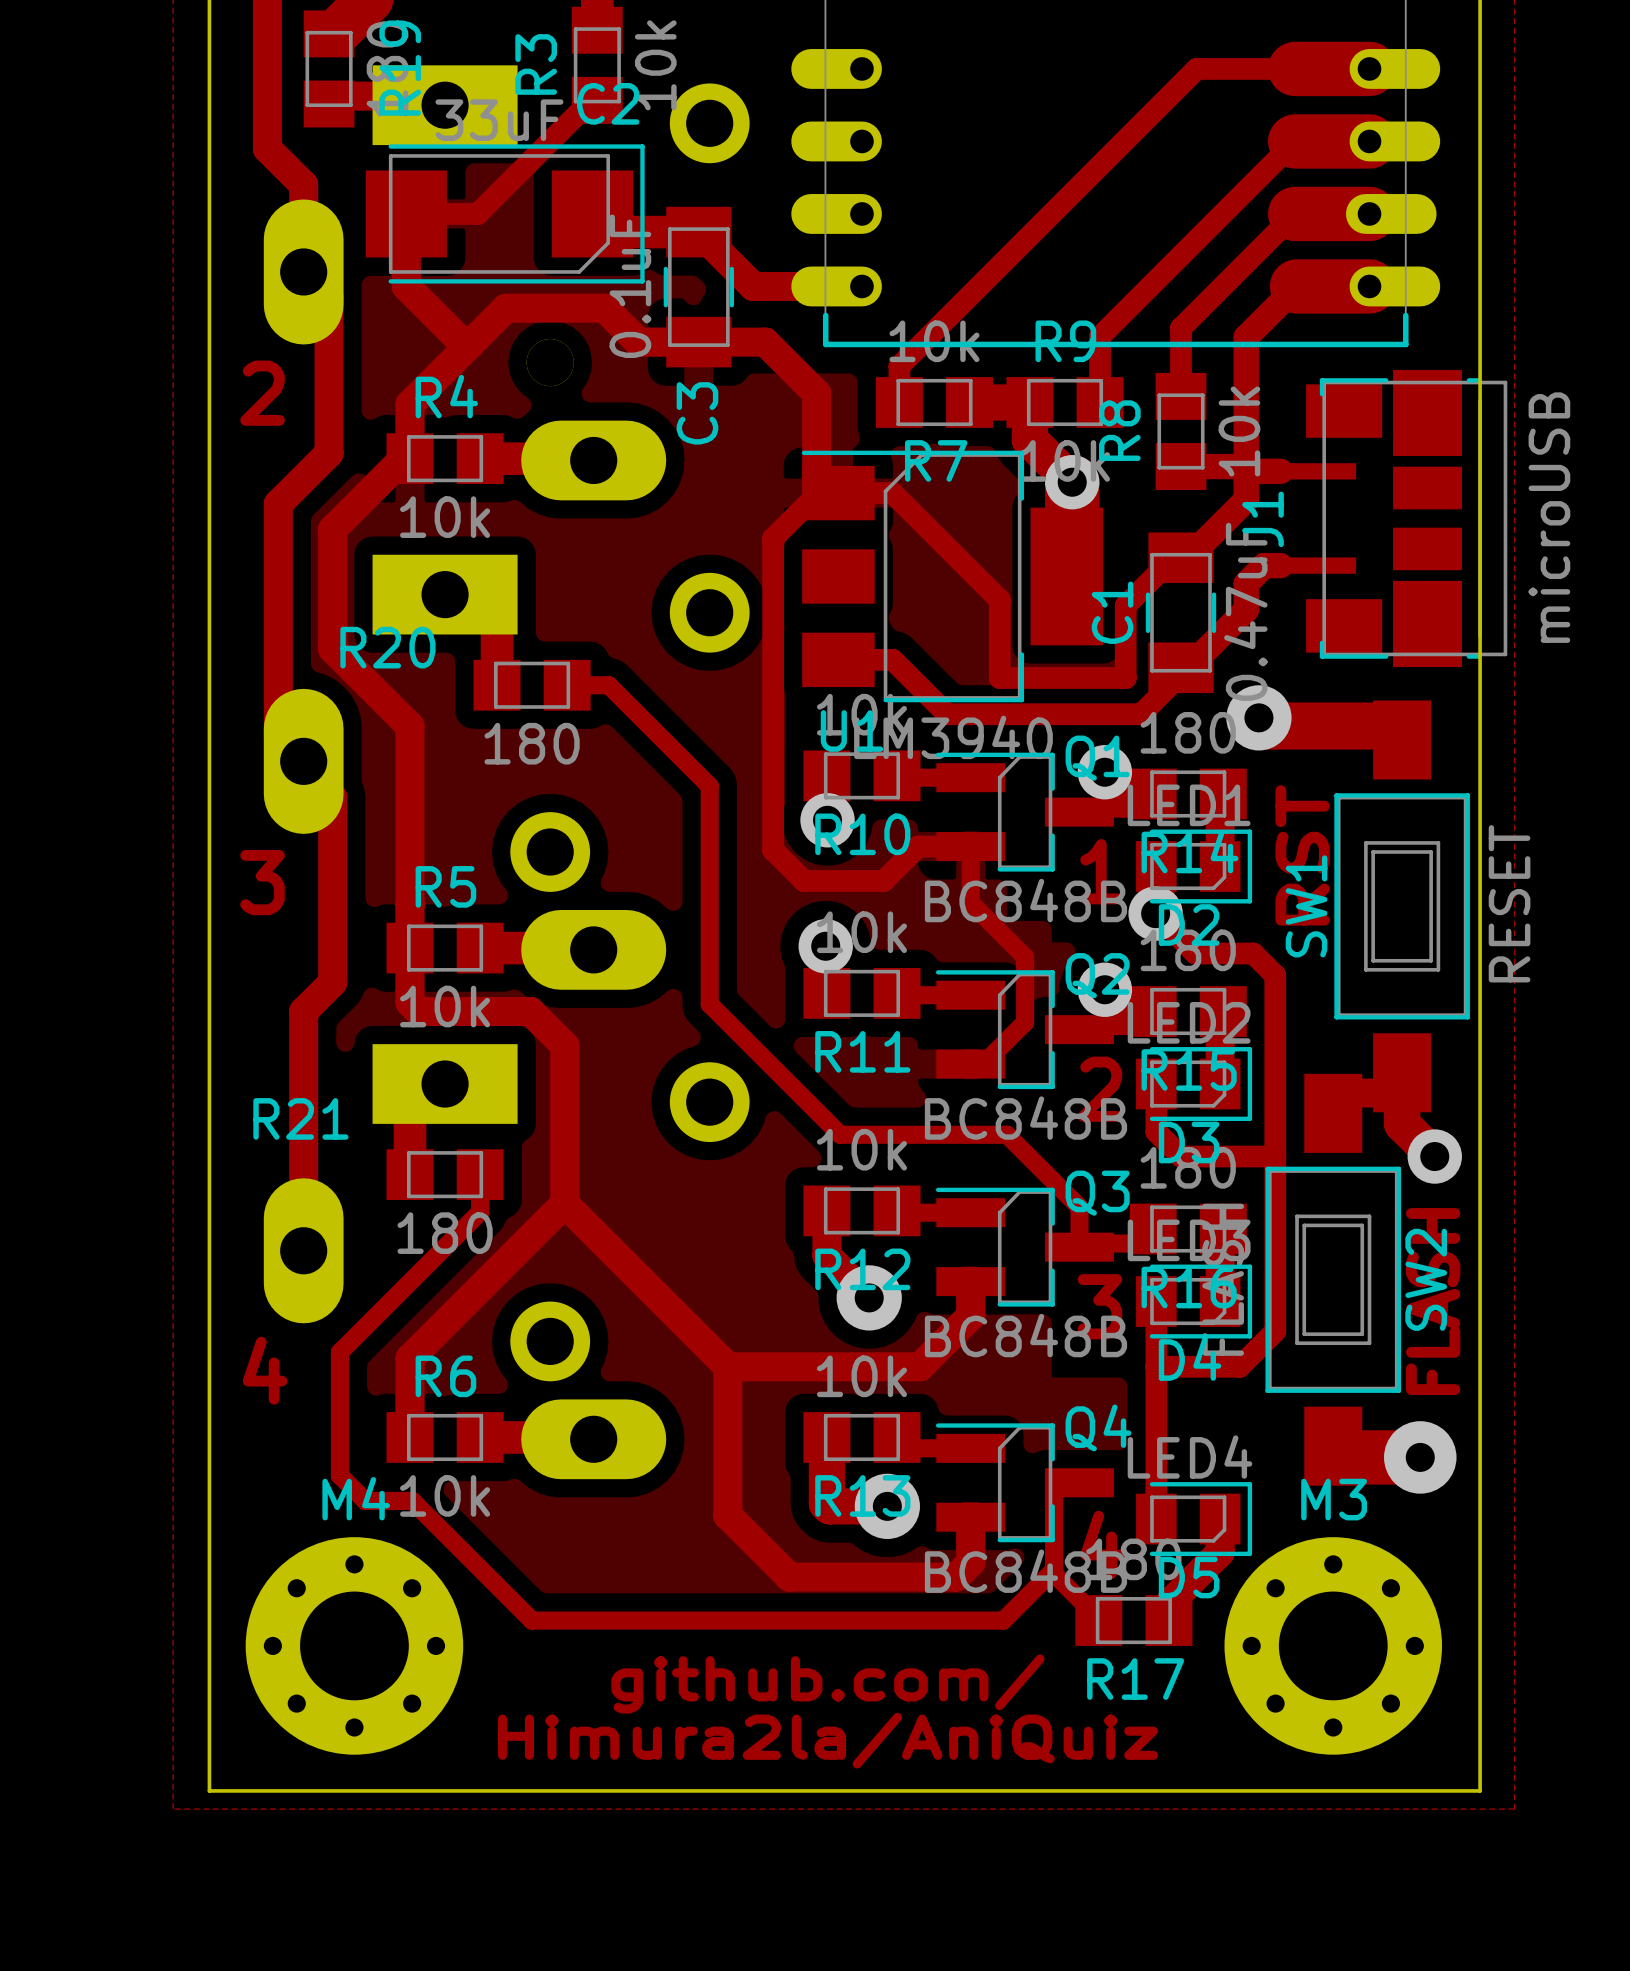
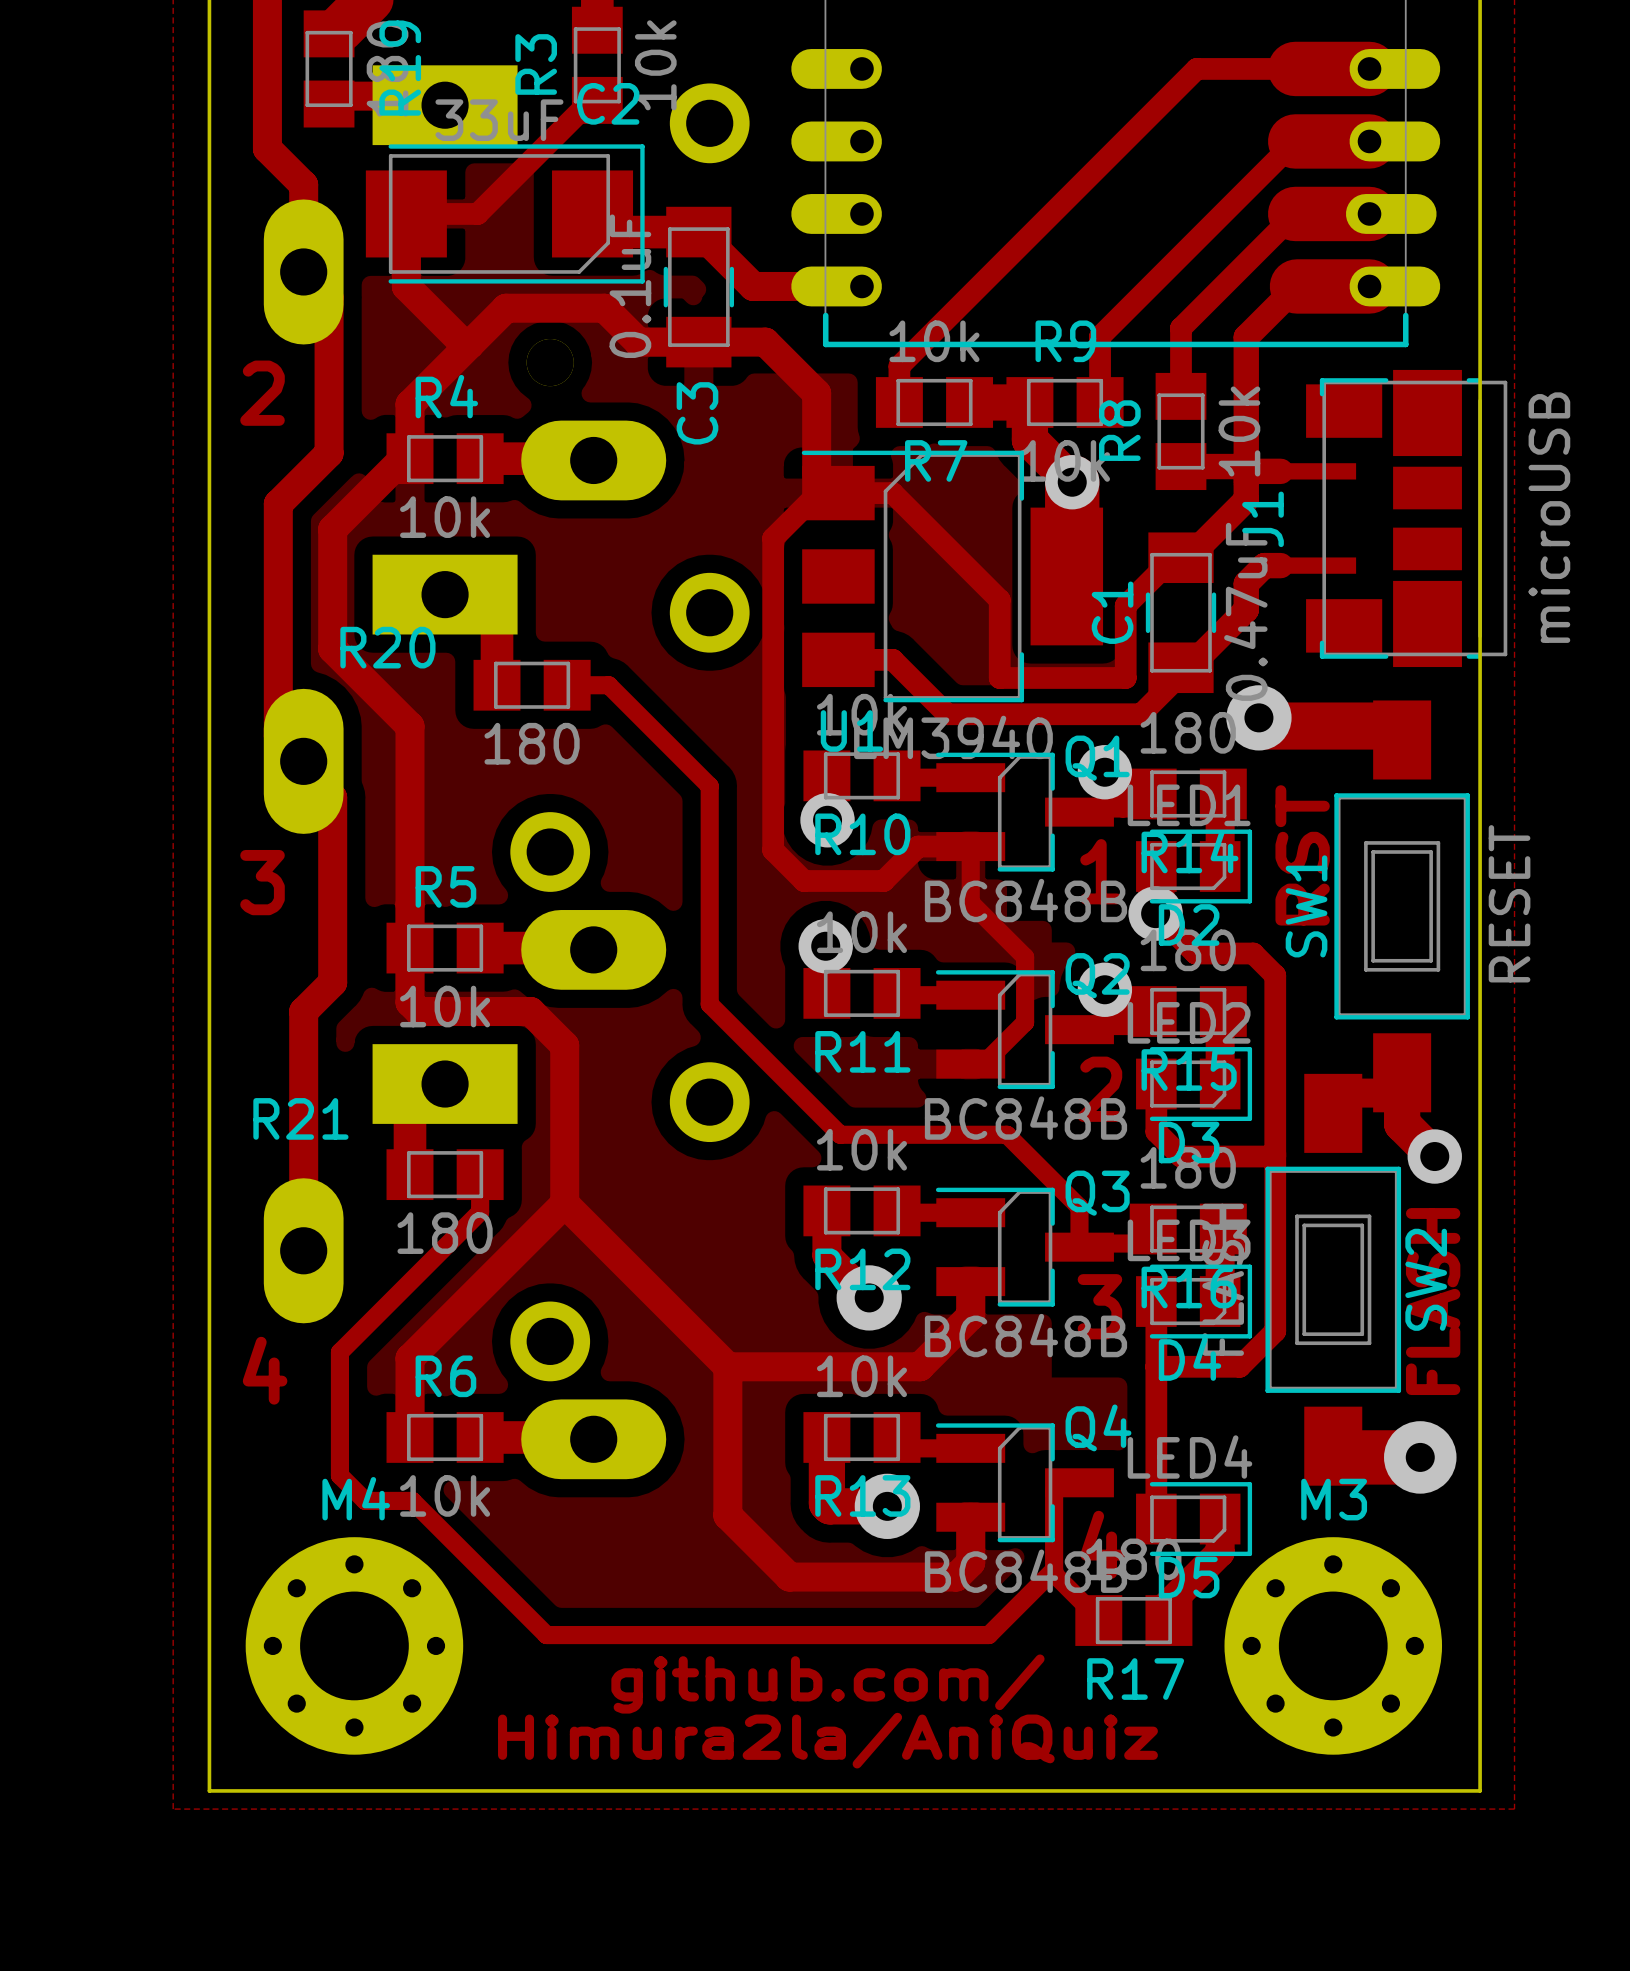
track: (532, 1620) (1003, 1620) -> (532, 1620) (546, 1635) (988, 1635) (1003, 1620)

